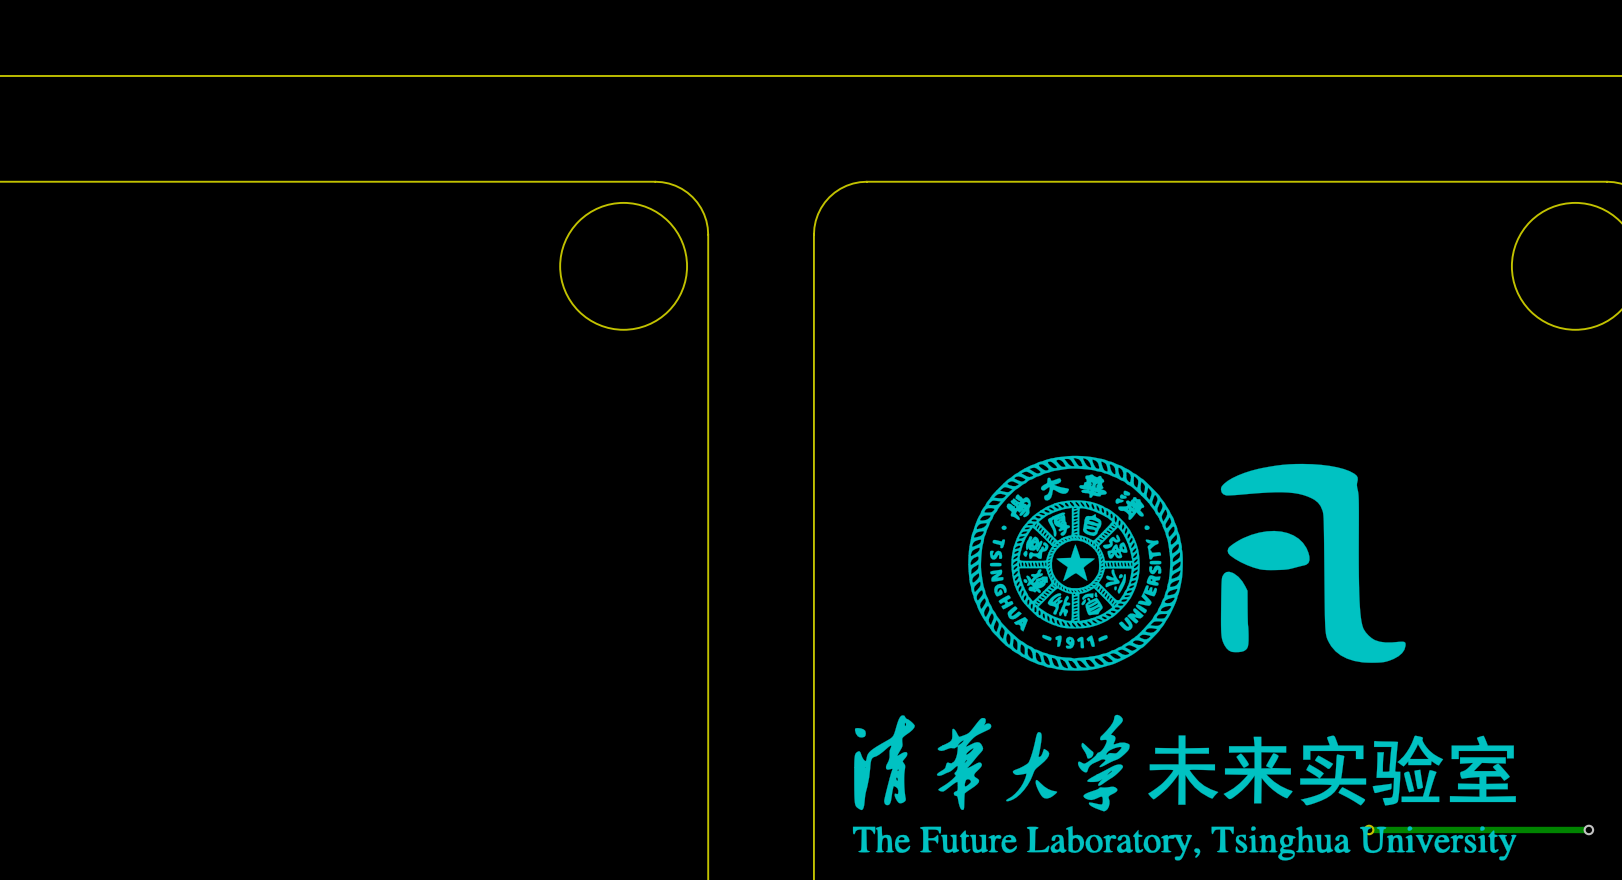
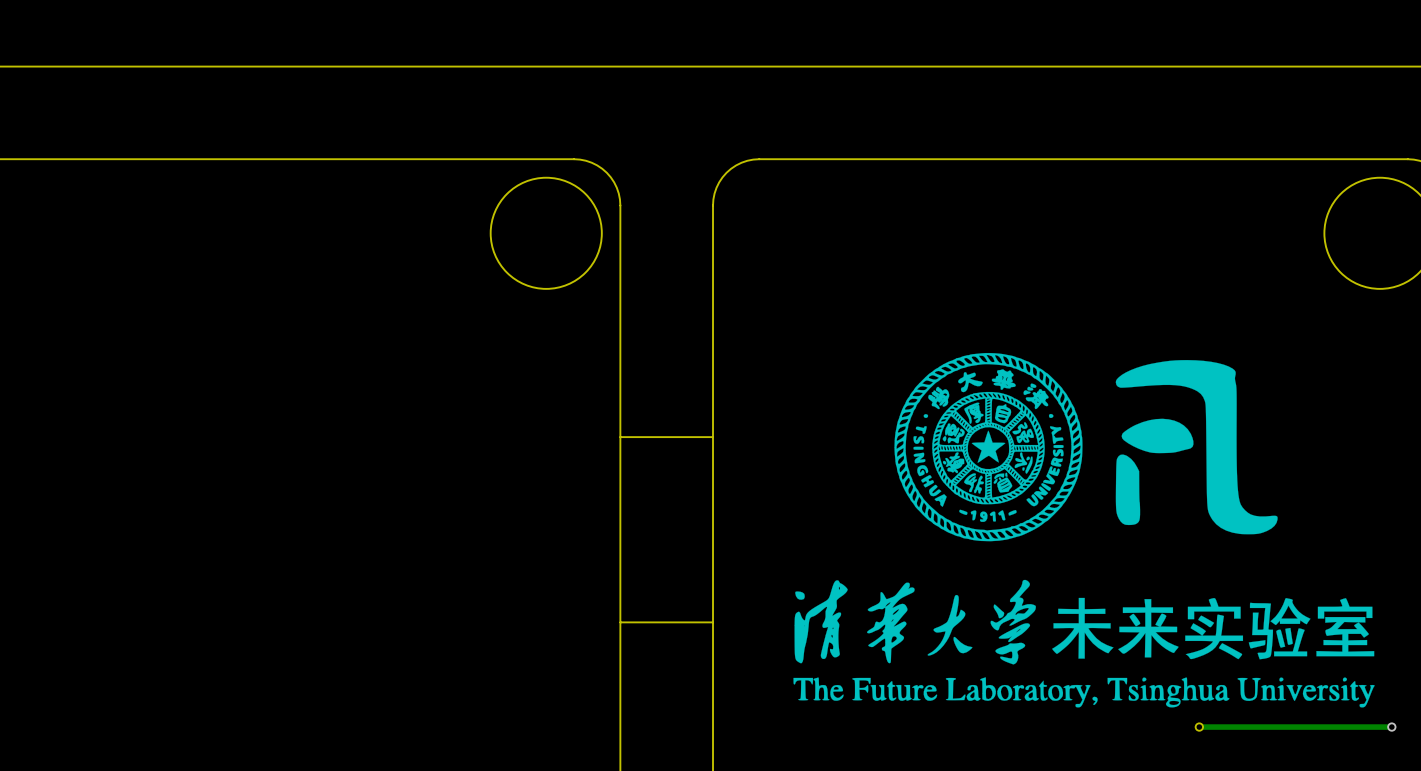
board edge: none -> (713, 437) (620, 437)
drawing position: (1184, 658) -> (1084, 530)
board edge: none -> (713, 622) (620, 622)

